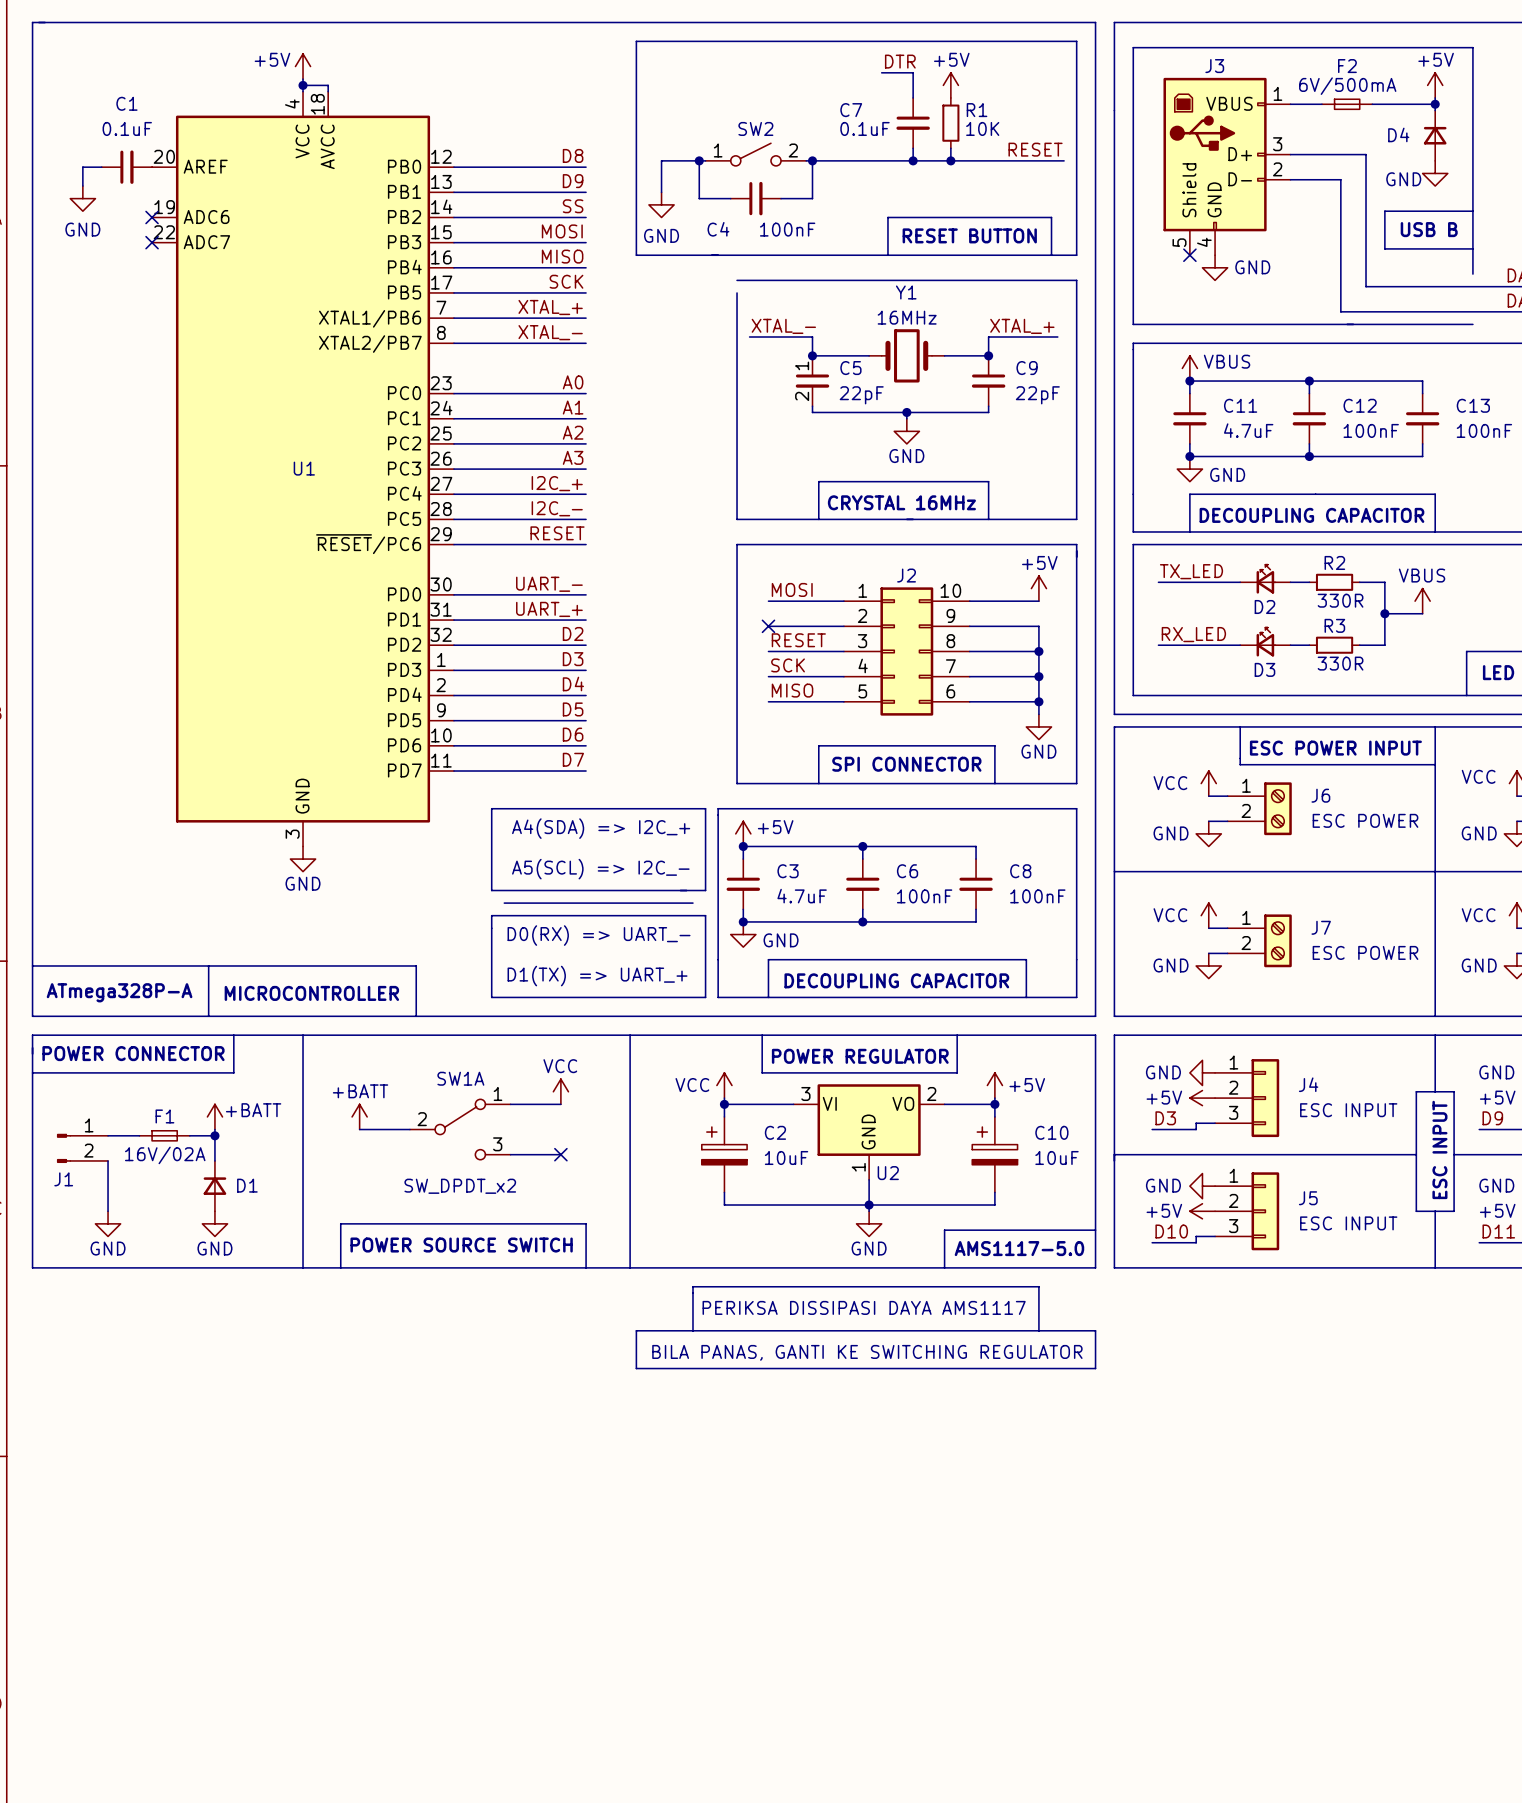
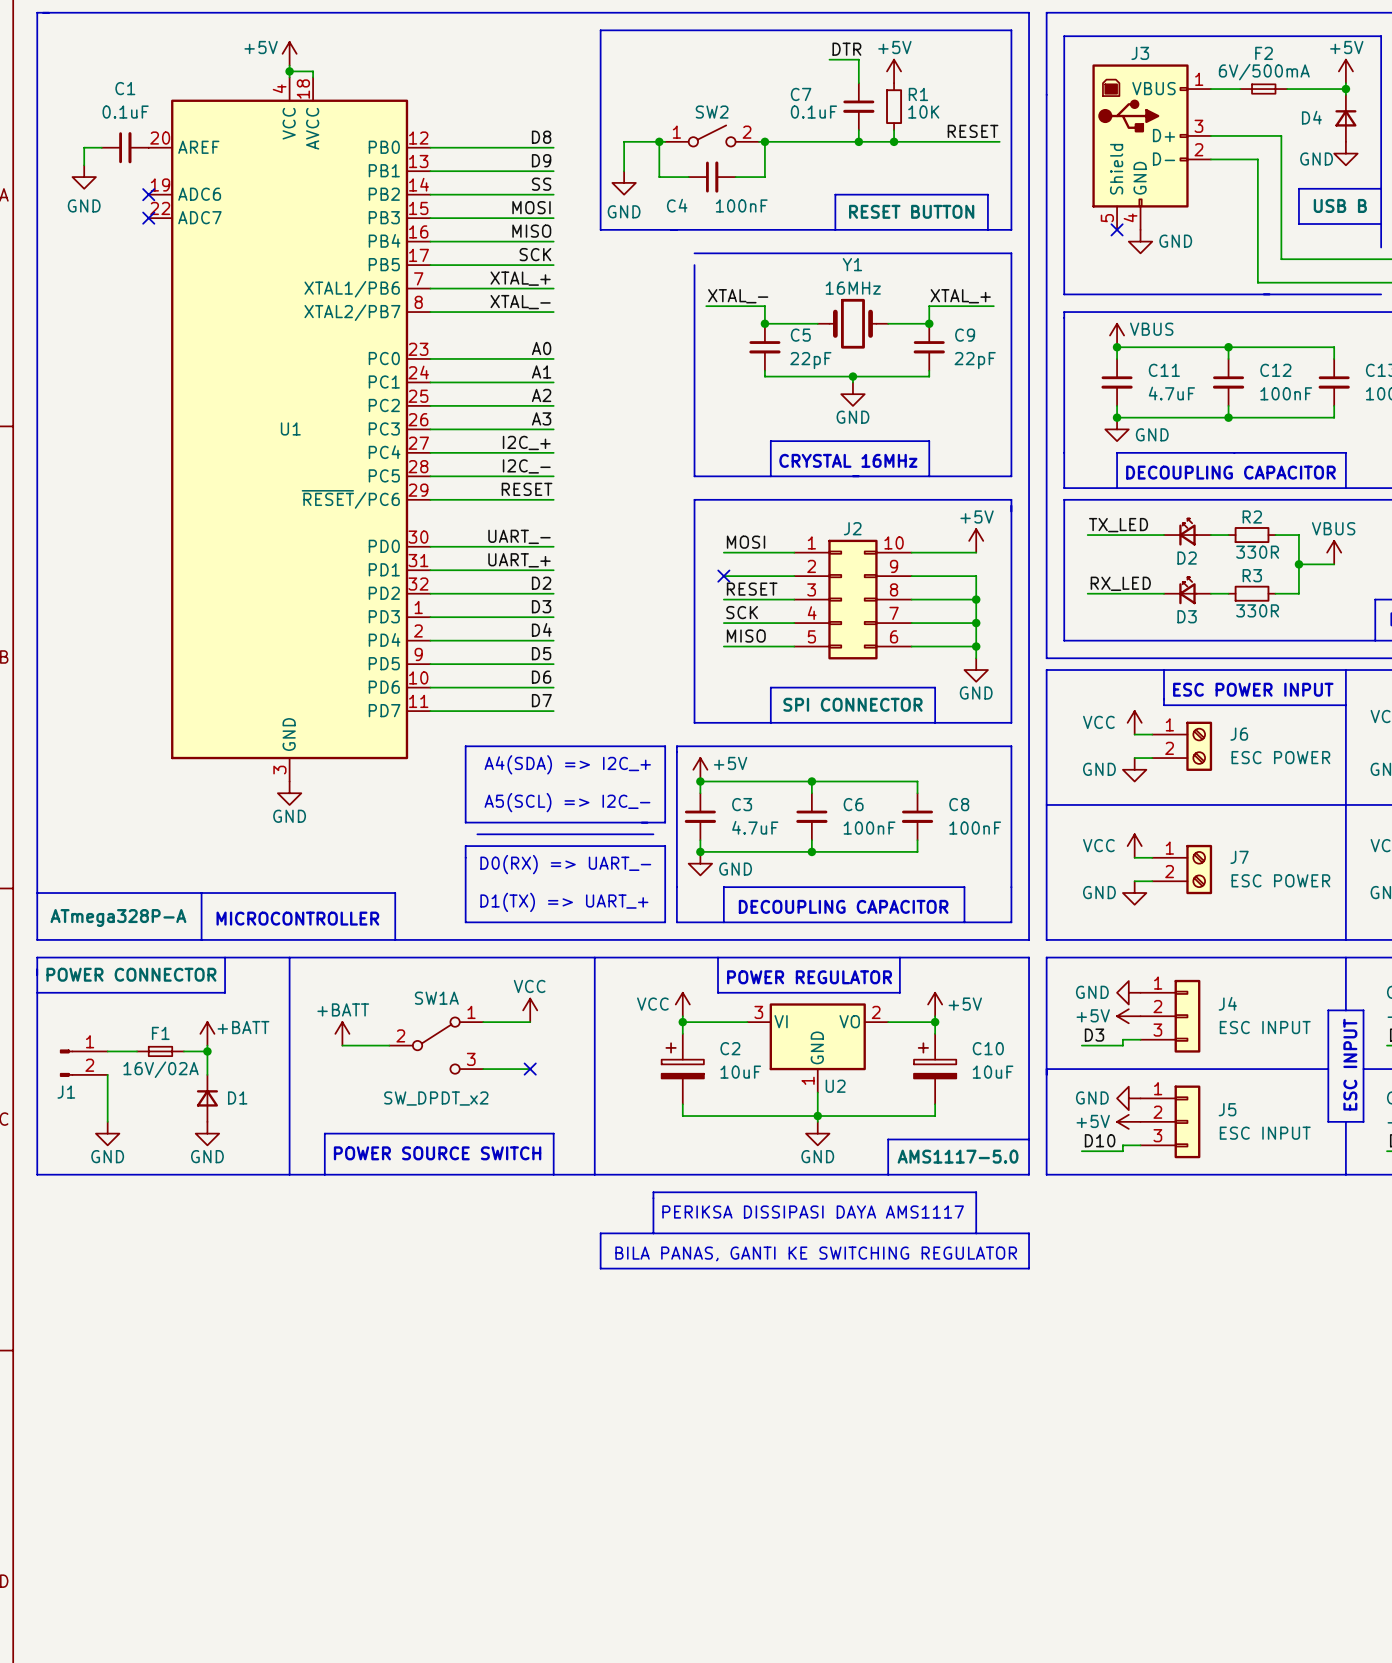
C5 pin number: 1 (802, 365) -> none
C5 pin number: 2 (802, 396) -> none

